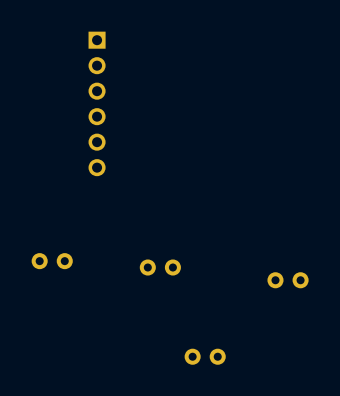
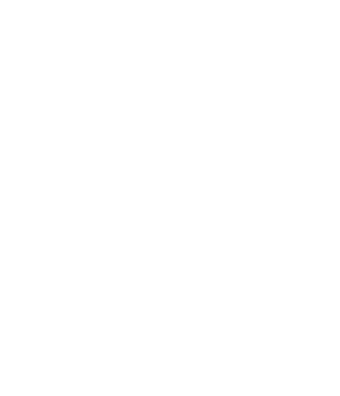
part: (97, 103) -> none
part: (52, 261) -> none
part: (160, 267) -> none
part: (288, 280) -> none
part: (205, 356) -> none

